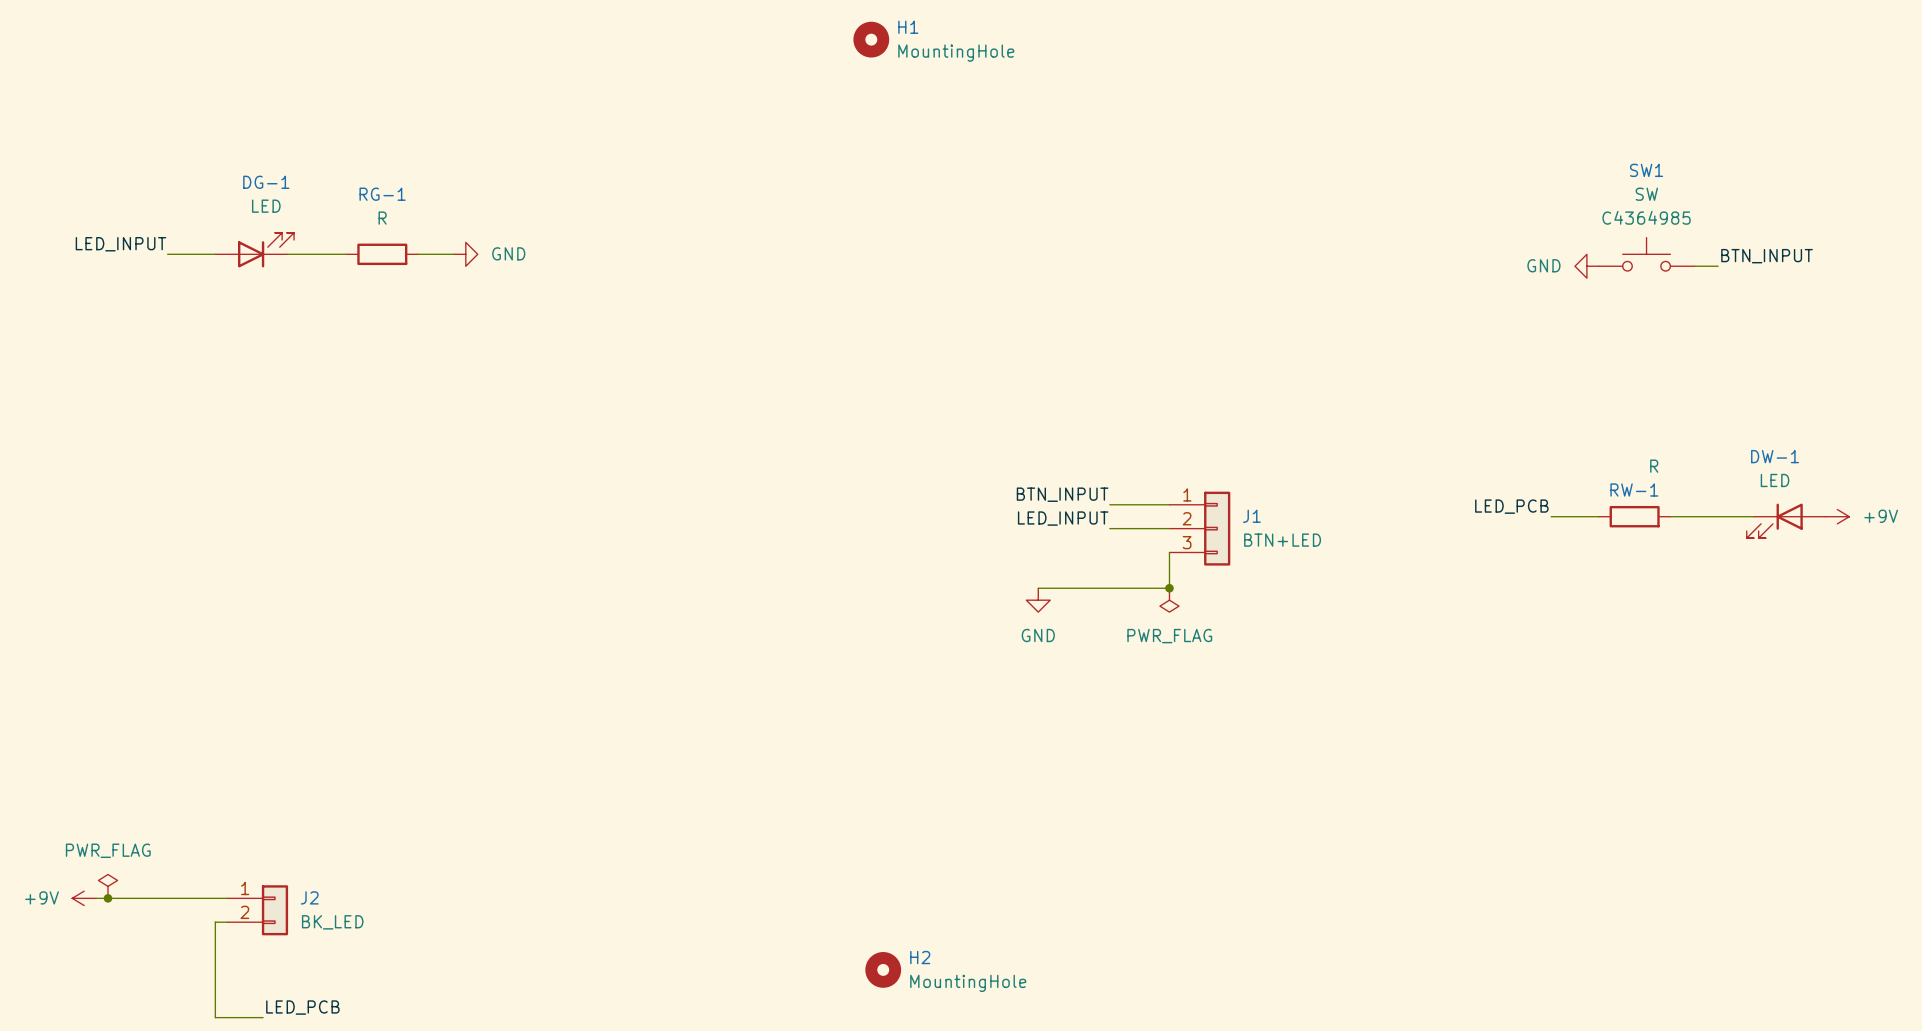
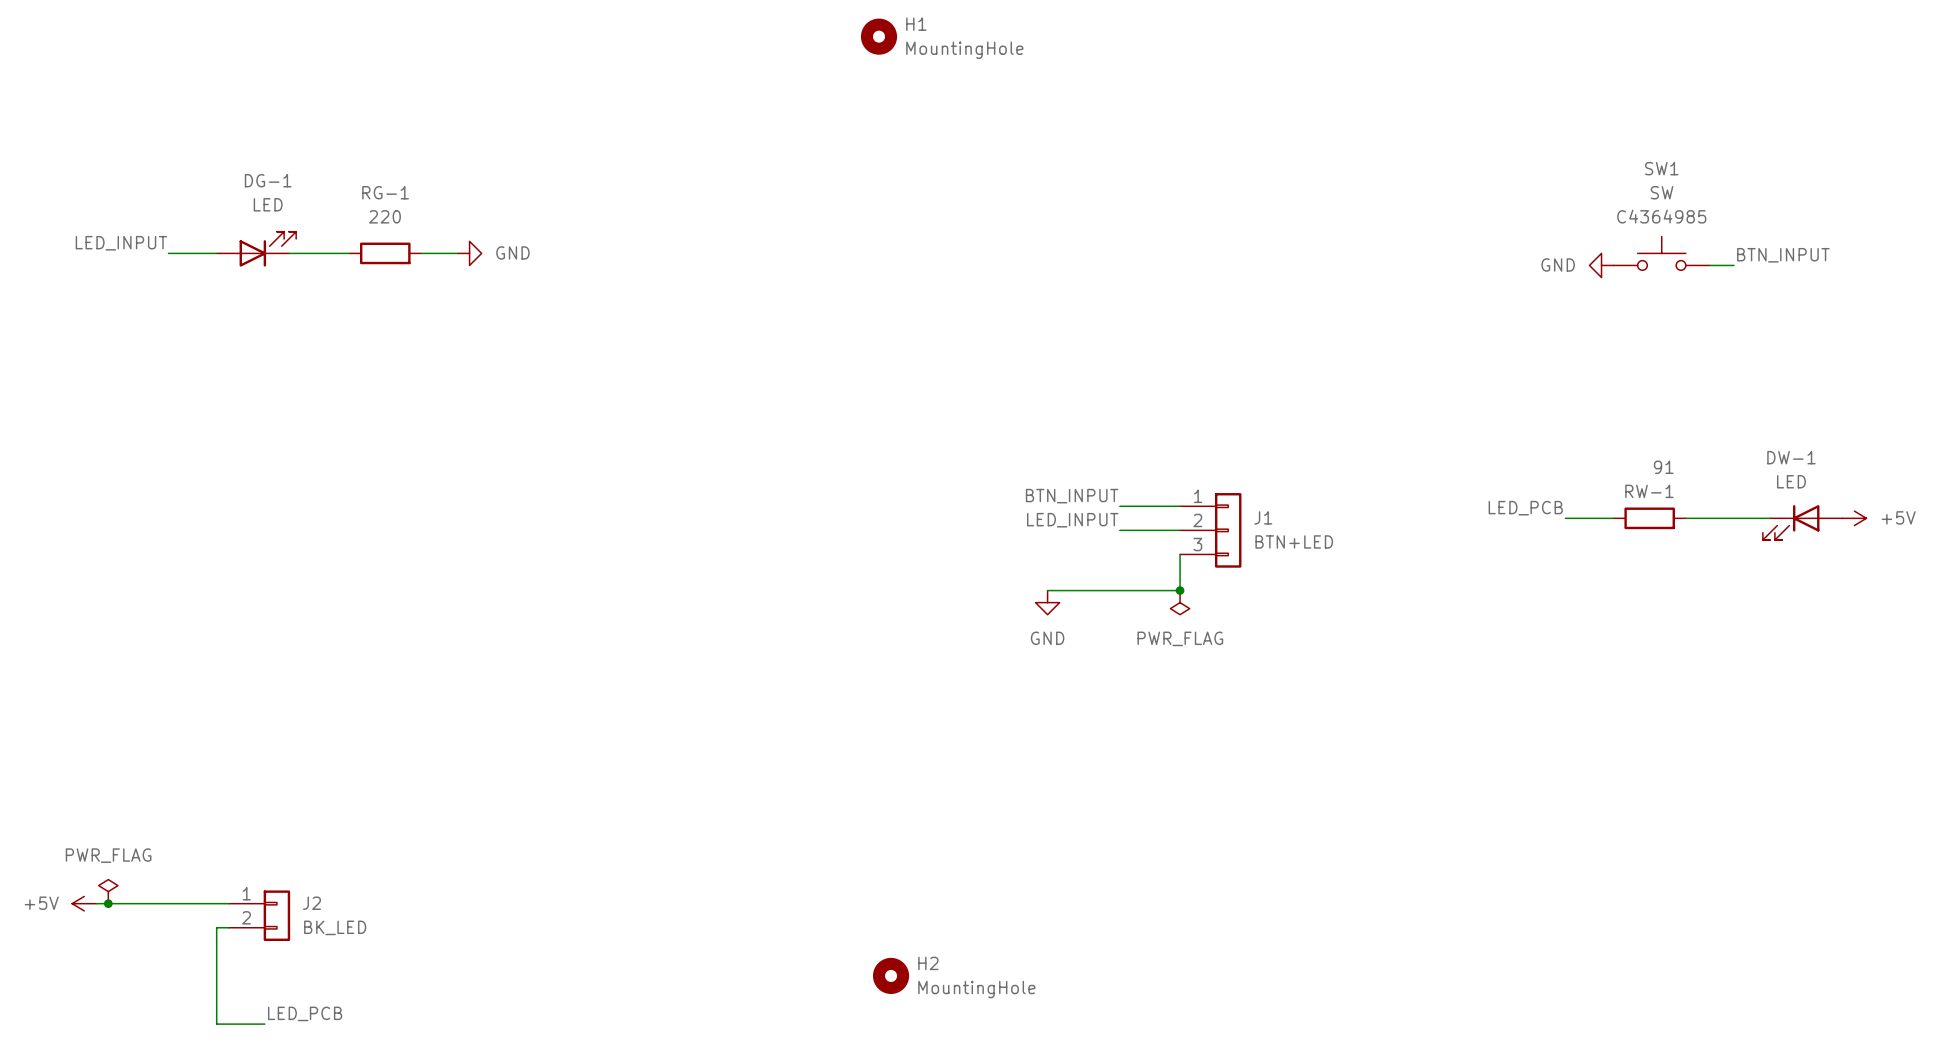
RG-1 value: R (382, 218) -> 220 (384, 216)
RW-1 value: R (1654, 466) -> 91 (1663, 467)
power symbol: +9V (1837, 516) -> +5V (1854, 518)
power symbol: +9V (84, 898) -> +5V (84, 903)

